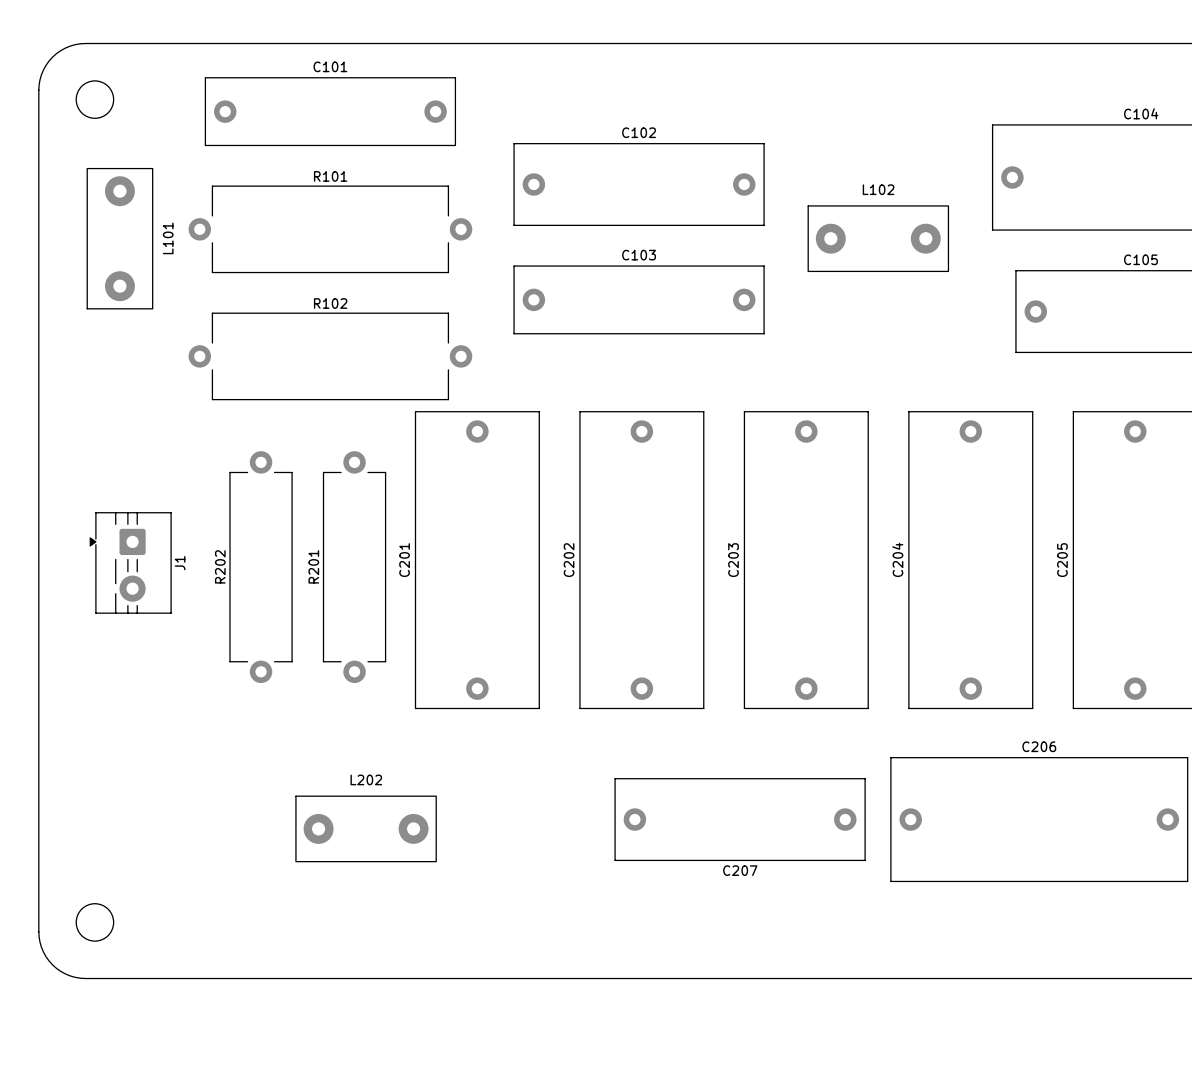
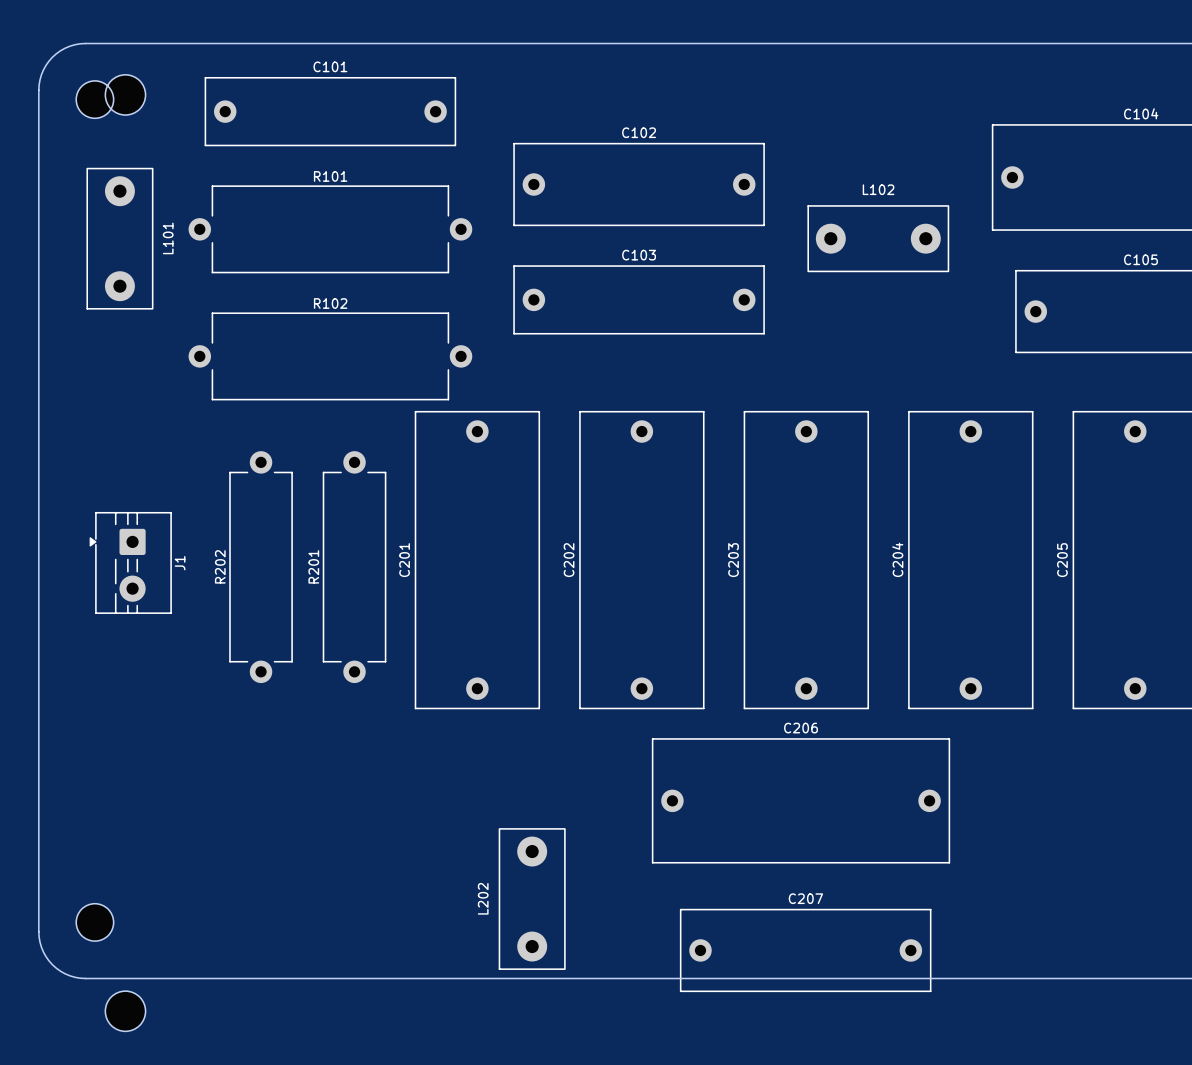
part: none -> (125, 94)
L202 name position: L202 (366, 779) -> L202 (483, 898)
C207 position: (740, 819) -> (805, 950)
C206 position: (1039, 819) -> (801, 800)
L202 rotation: 0° (366, 828) -> 90° clockwise (532, 899)
L202 position: (366, 828) -> (532, 899)
C207 name position: C207 (740, 870) -> C207 (805, 898)
part: none -> (125, 1011)

